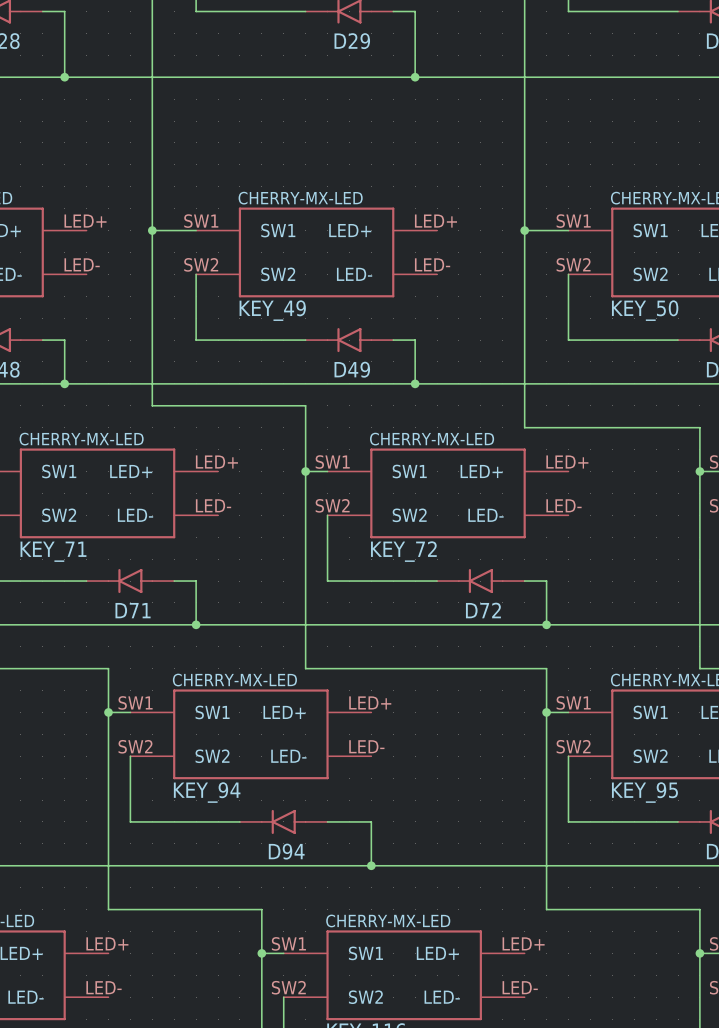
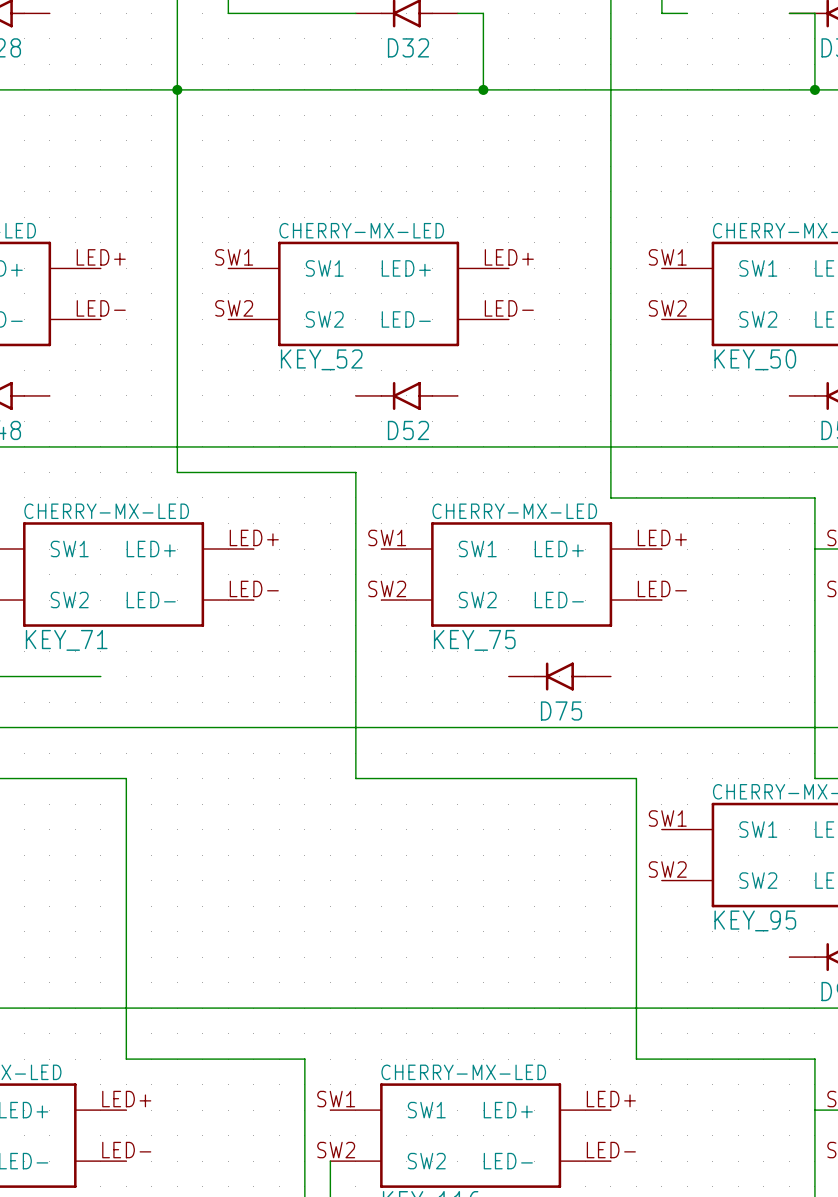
wire: (42, 11) (64, 11) (64, 77) -> none
wire: (590, 11) (678, 11) -> (814, 89) (814, 13) (789, 13)
D29 name: D29 (352, 41) -> D32 (408, 47)
junction: (64, 77) -> none
junction: none -> (177, 89)
junction: none -> (814, 89)
wire: (152, 230) (196, 230) -> none
junction: (152, 230) -> none
wire: (524, 230) (568, 230) -> none
junction: (524, 230) -> none
wire: (196, 274) (196, 340) (305, 340) -> none
wire: (568, 274) (568, 340) (678, 340) -> none
KEY_49 name: KEY_49 (272, 310) -> KEY_52 (321, 359)
wire: (42, 340) (64, 340) (64, 383) -> none
wire: (393, 340) (415, 340) (415, 383) -> none
D49 name: D49 (352, 369) -> D52 (408, 430)
junction: (64, 383) -> none
junction: (415, 383) -> none
wire: (305, 471) (327, 471) -> none
junction: (305, 471) -> none
junction: (699, 471) -> none
wire: (327, 515) (327, 581) (437, 581) -> none
KEY_72 name: KEY_72 (403, 551) -> KEY_75 (474, 640)
D71: (130, 581) -> none
wire: (174, 581) (196, 581) (196, 624) -> none
wire: (524, 581) (546, 581) (546, 624) -> none
D72 name: D72 (483, 610) -> D75 (561, 710)
junction: (196, 624) -> none
junction: (546, 624) -> none
wire: (108, 712) (130, 712) -> none
junction: (108, 712) -> none
wire: (546, 712) (568, 712) -> none
junction: (546, 712) -> none
KEY_94: (250, 734) -> none
wire: (130, 756) (130, 821) (239, 821) -> none
wire: (568, 756) (568, 821) (678, 821) -> none
D94: (283, 821) -> none
wire: (327, 821) (371, 821) (371, 865) -> none
junction: (371, 865) -> none
wire: (261, 953) (283, 953) -> none
junction: (261, 953) -> none
junction: (699, 953) -> none

